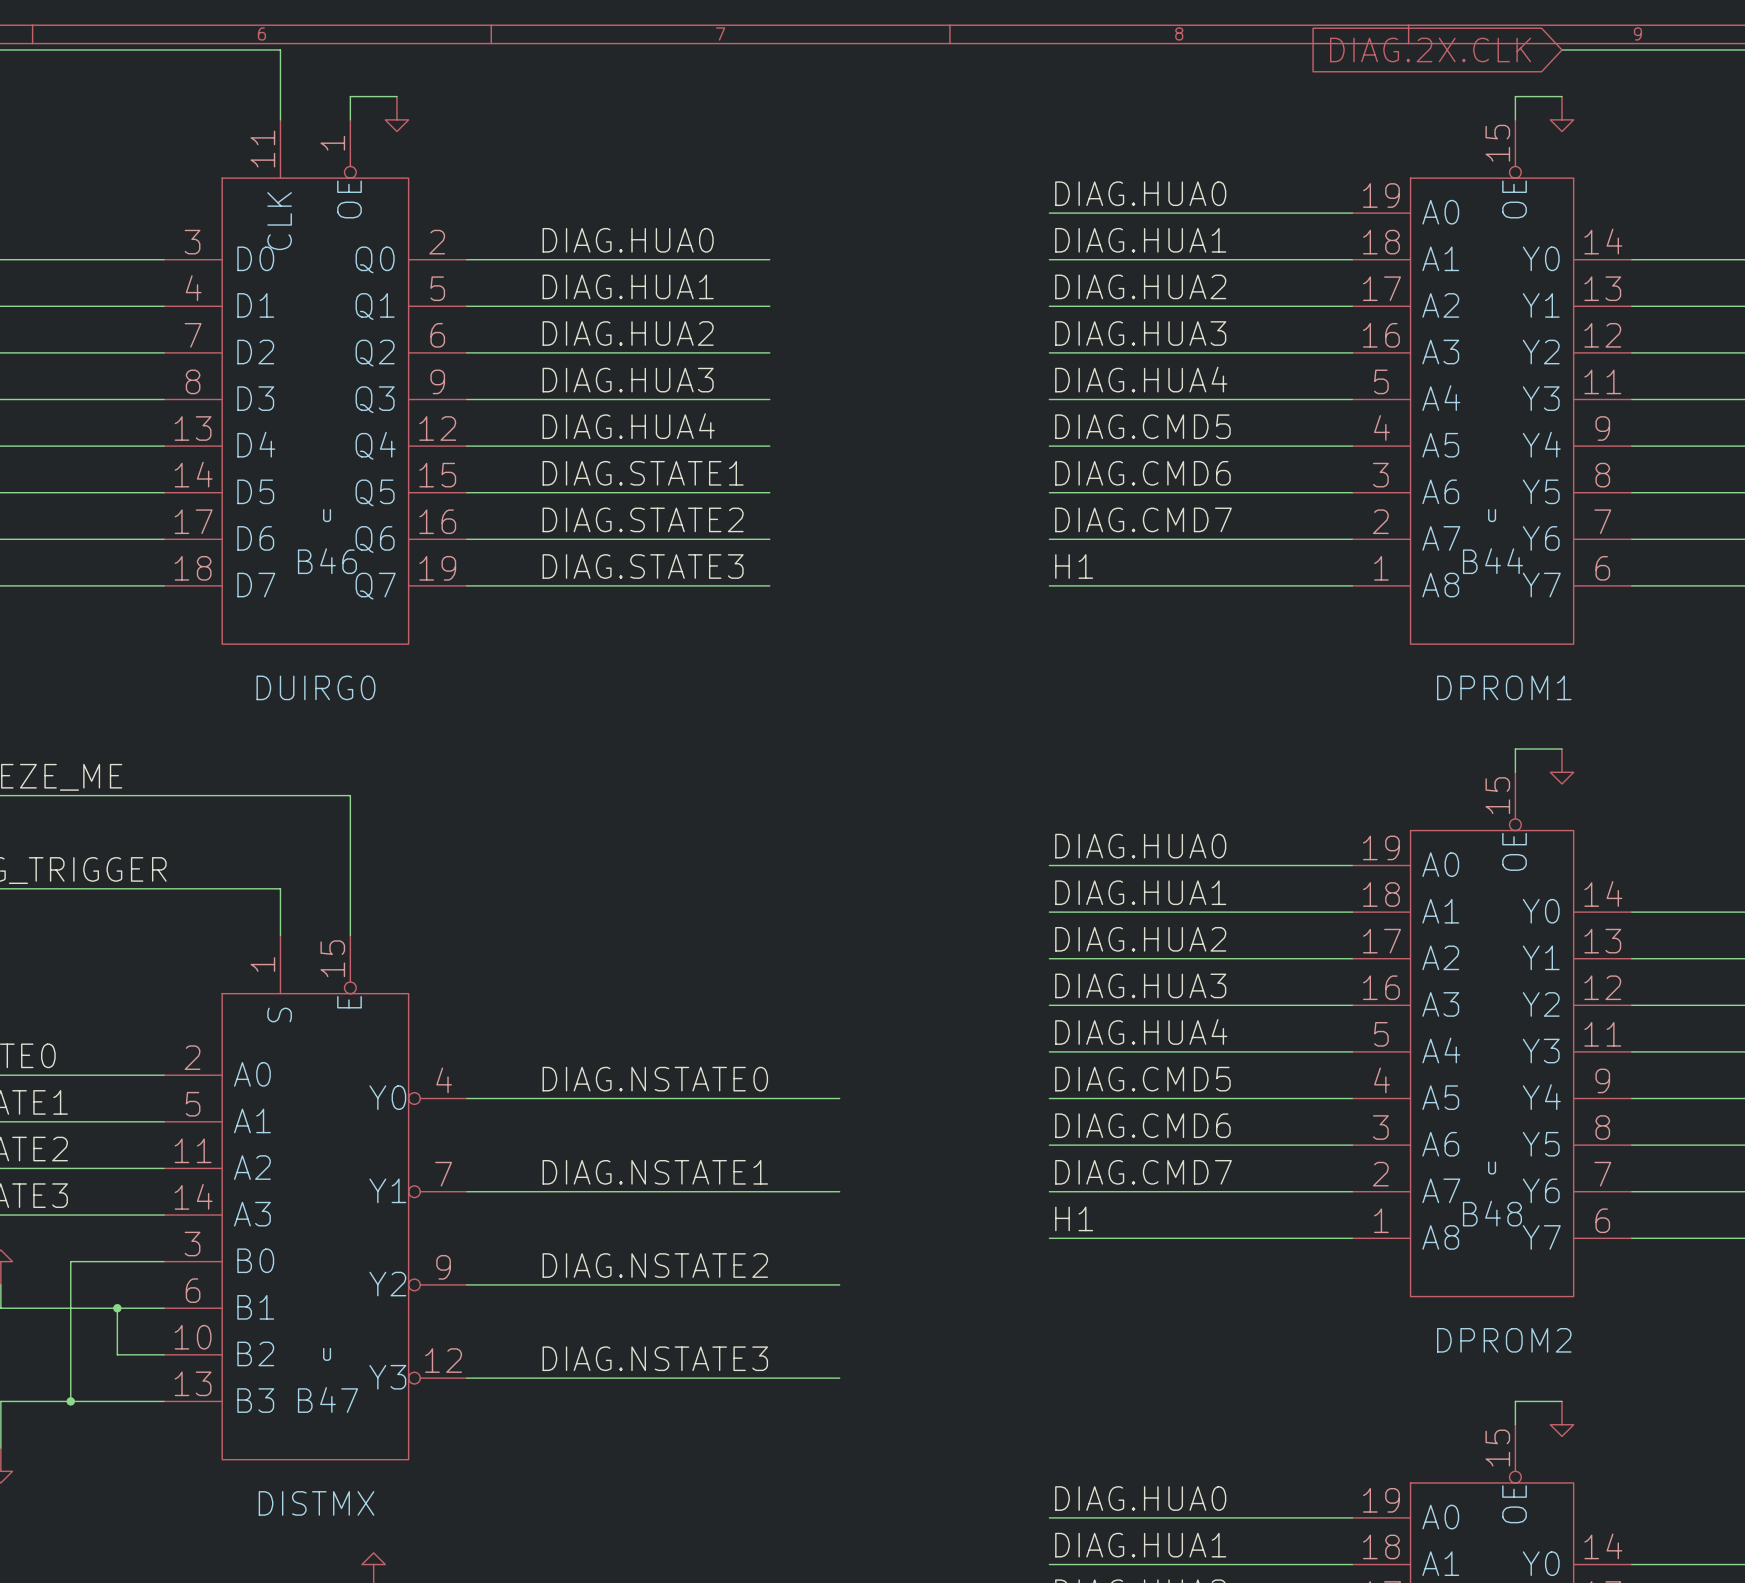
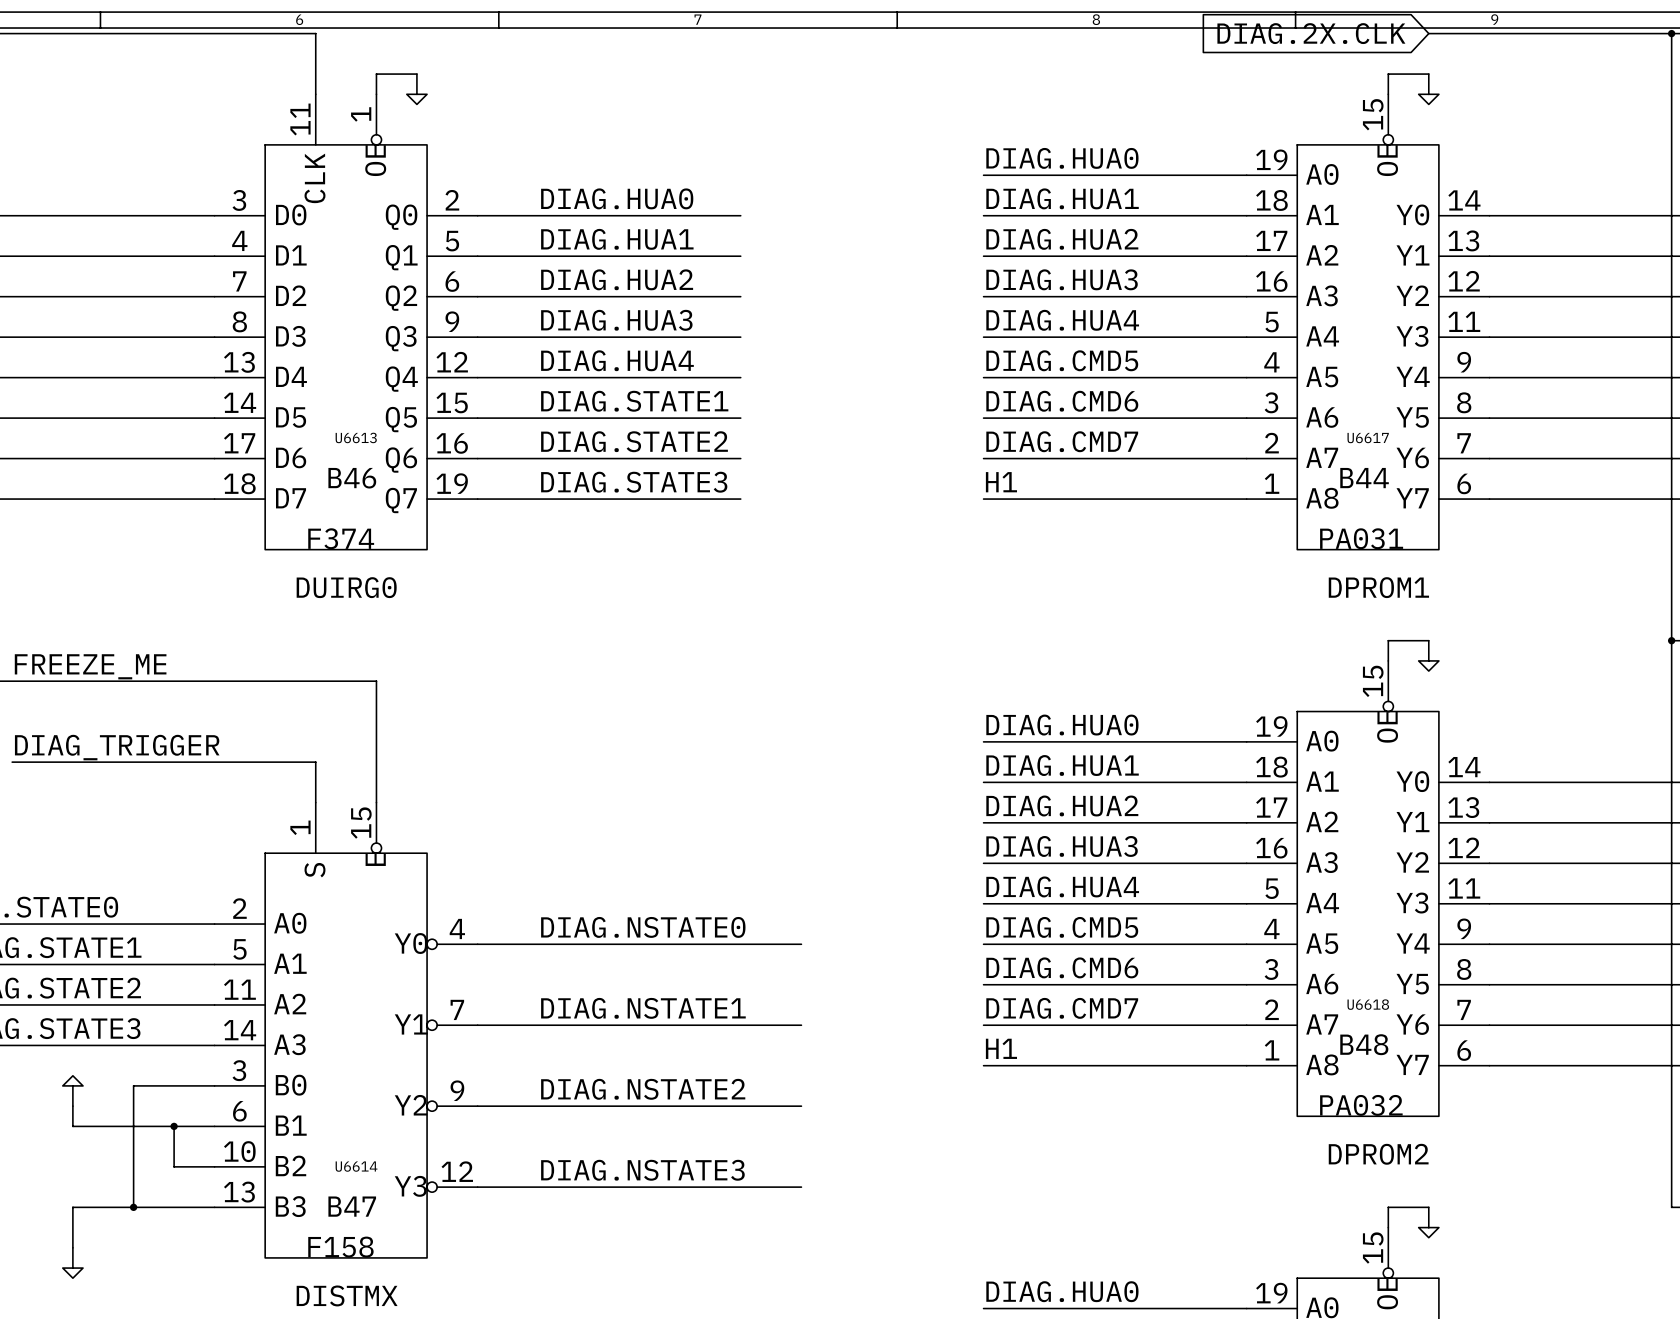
U name: U (327, 515) -> U6613 (356, 437)
U name: U (1492, 515) -> U6617 (1368, 438)
U value: none -> F374 (341, 538)
U value: none -> PA031 (1361, 538)
U name: U (1492, 1167) -> U6618 (1368, 1004)
U value: none -> PA032 (1361, 1105)
U name: U (327, 1354) -> U6614 (356, 1166)
U value: none -> F158 (340, 1247)

